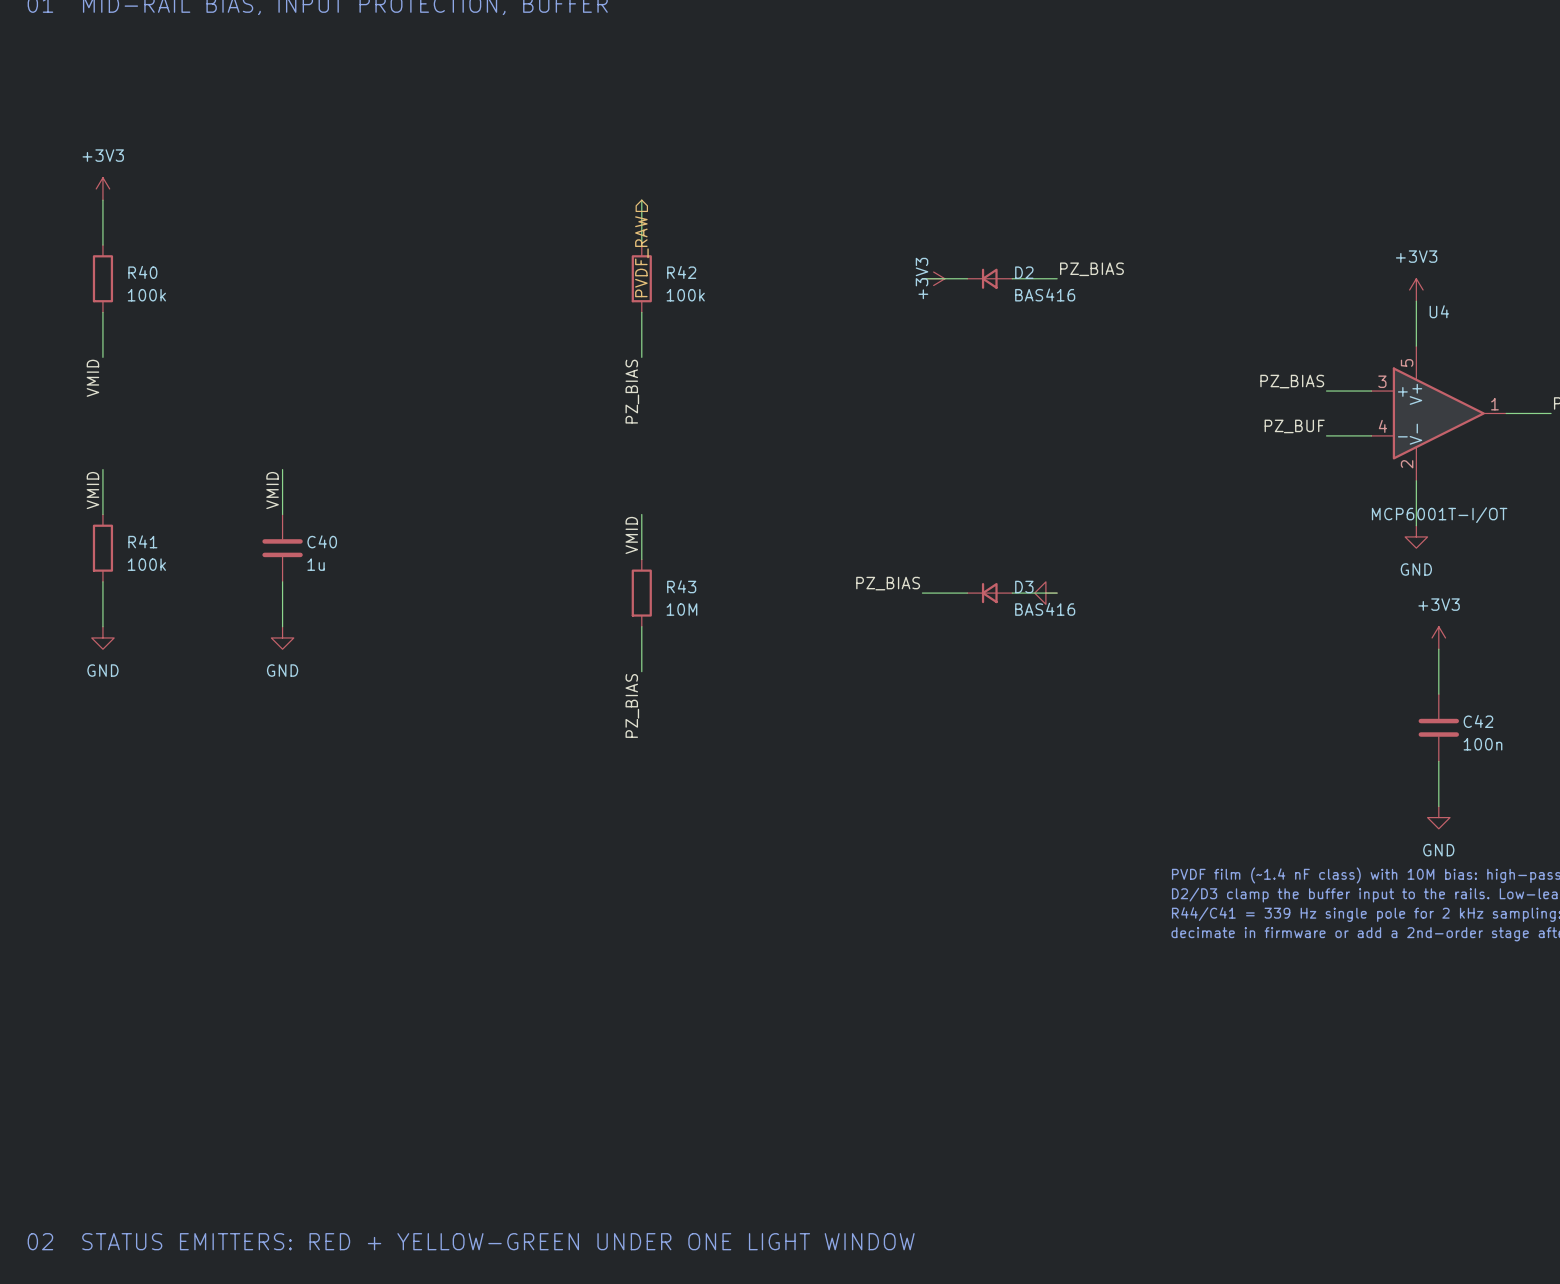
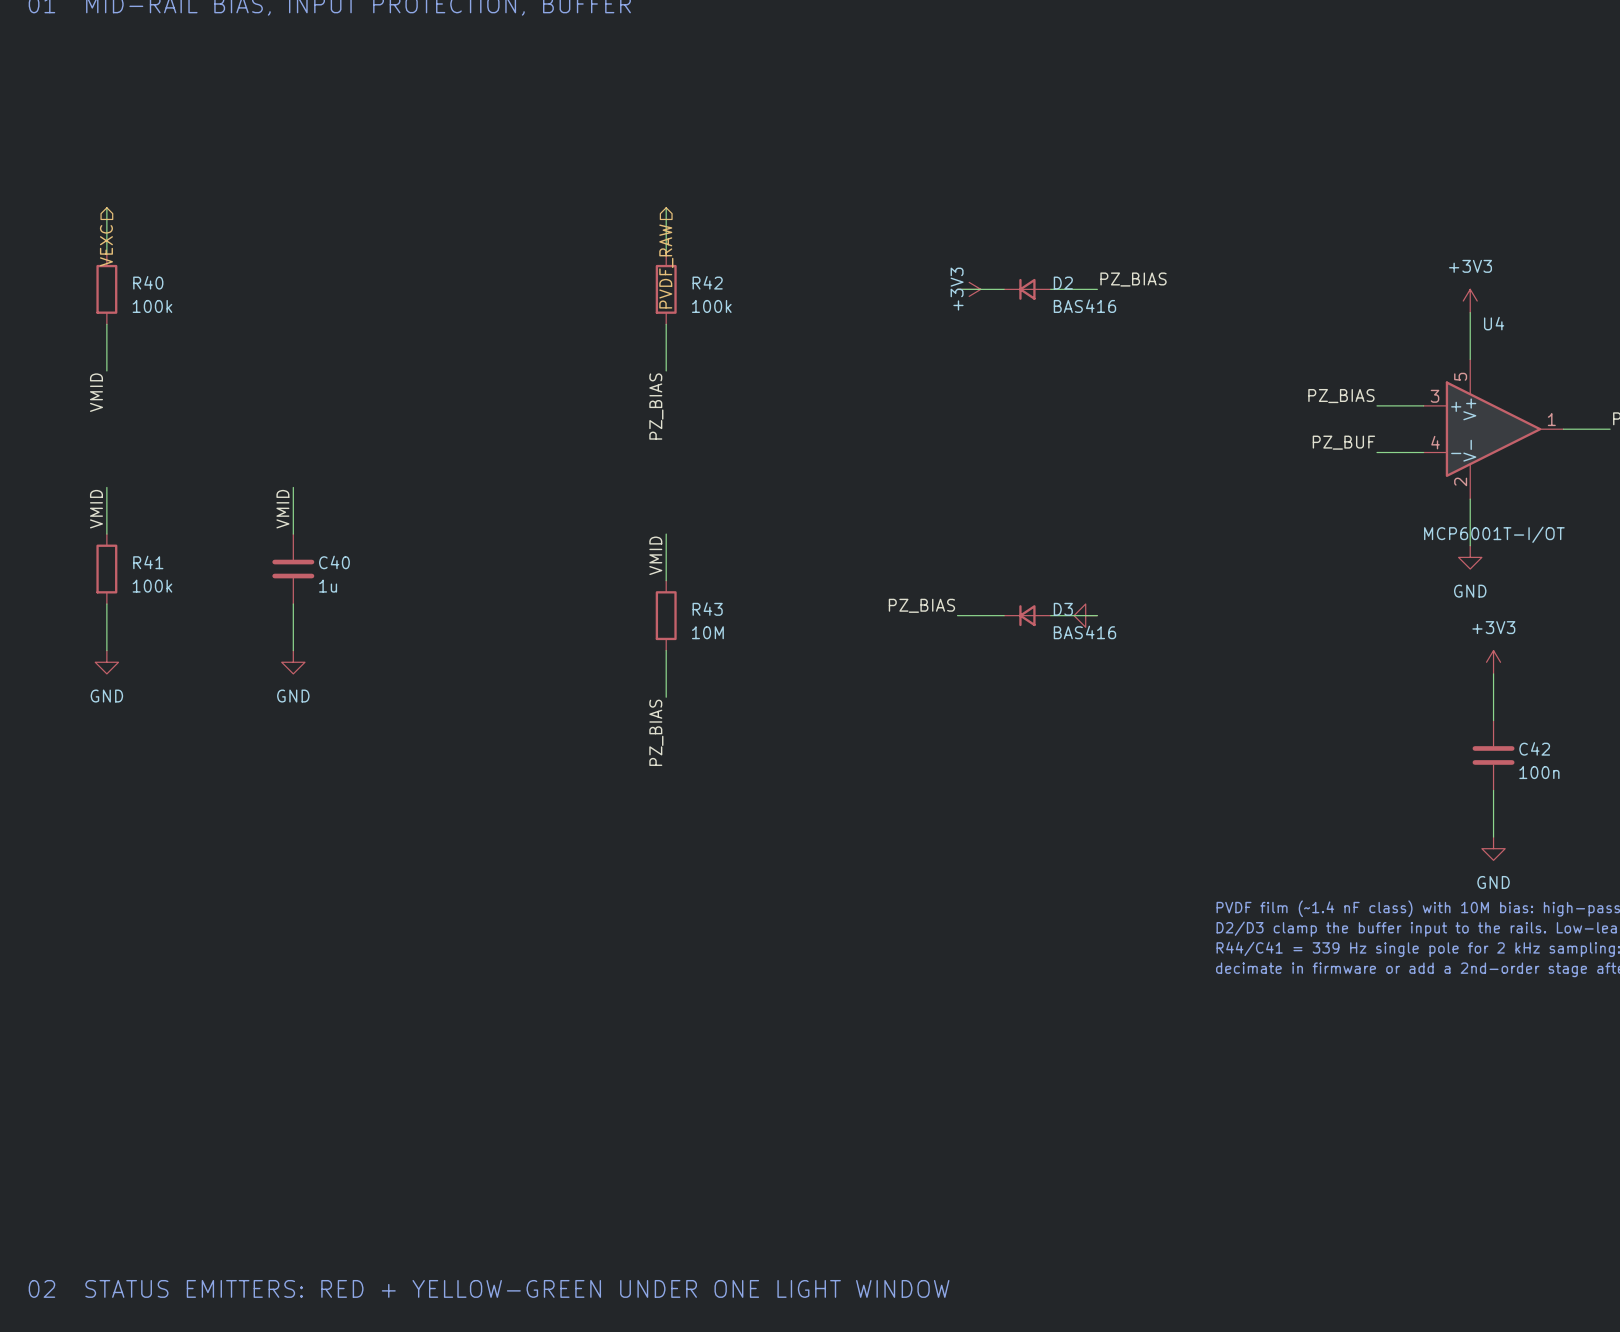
power symbol: +3V3 (102, 188) -> none
hierarchical label: none -> VEXC (106, 245)

